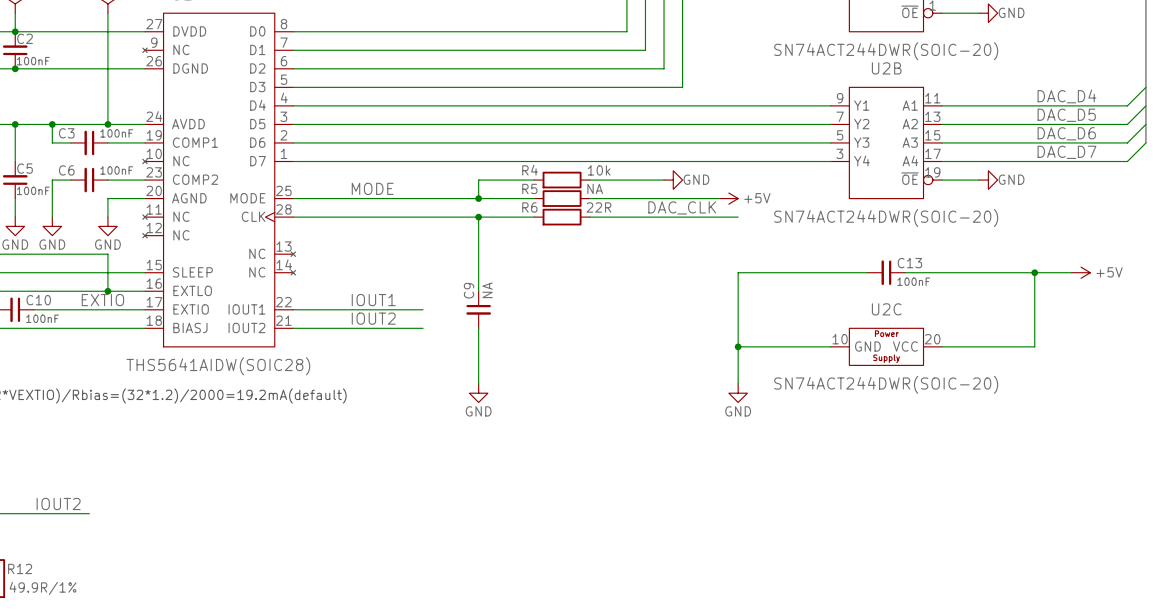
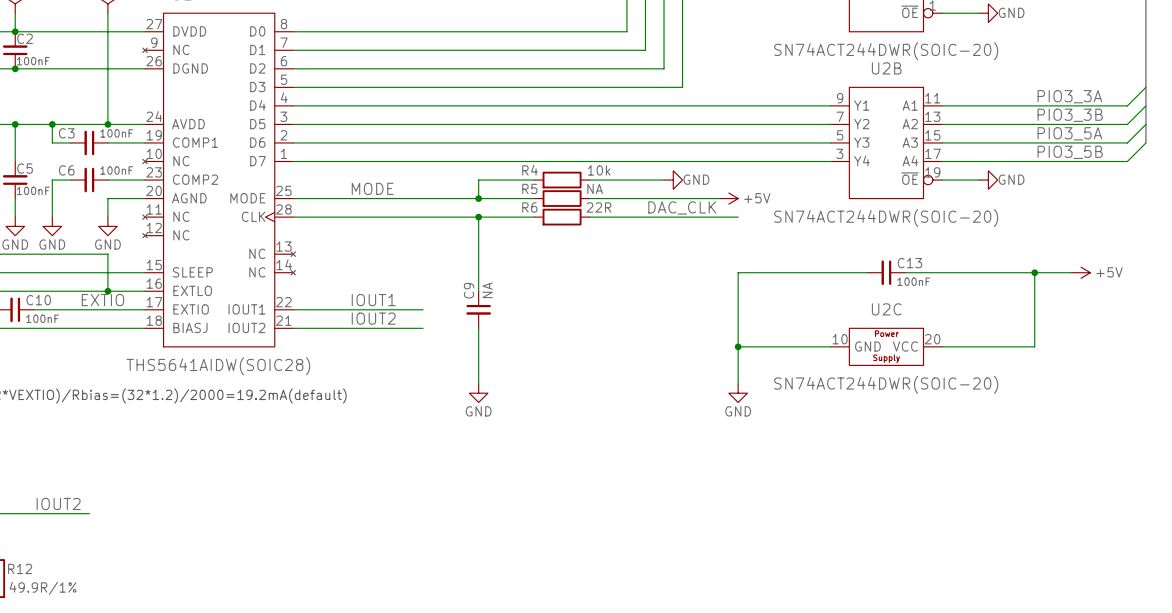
label: DAC_D4 (1066, 96) -> PIO3_3A (1069, 96)
label: DAC_D5 (1066, 115) -> PIO3_3B (1070, 115)
label: DAC_D6 (1066, 133) -> PIO3_5A (1069, 133)
label: DAC_D7 (1066, 152) -> PIO3_5B (1070, 152)

